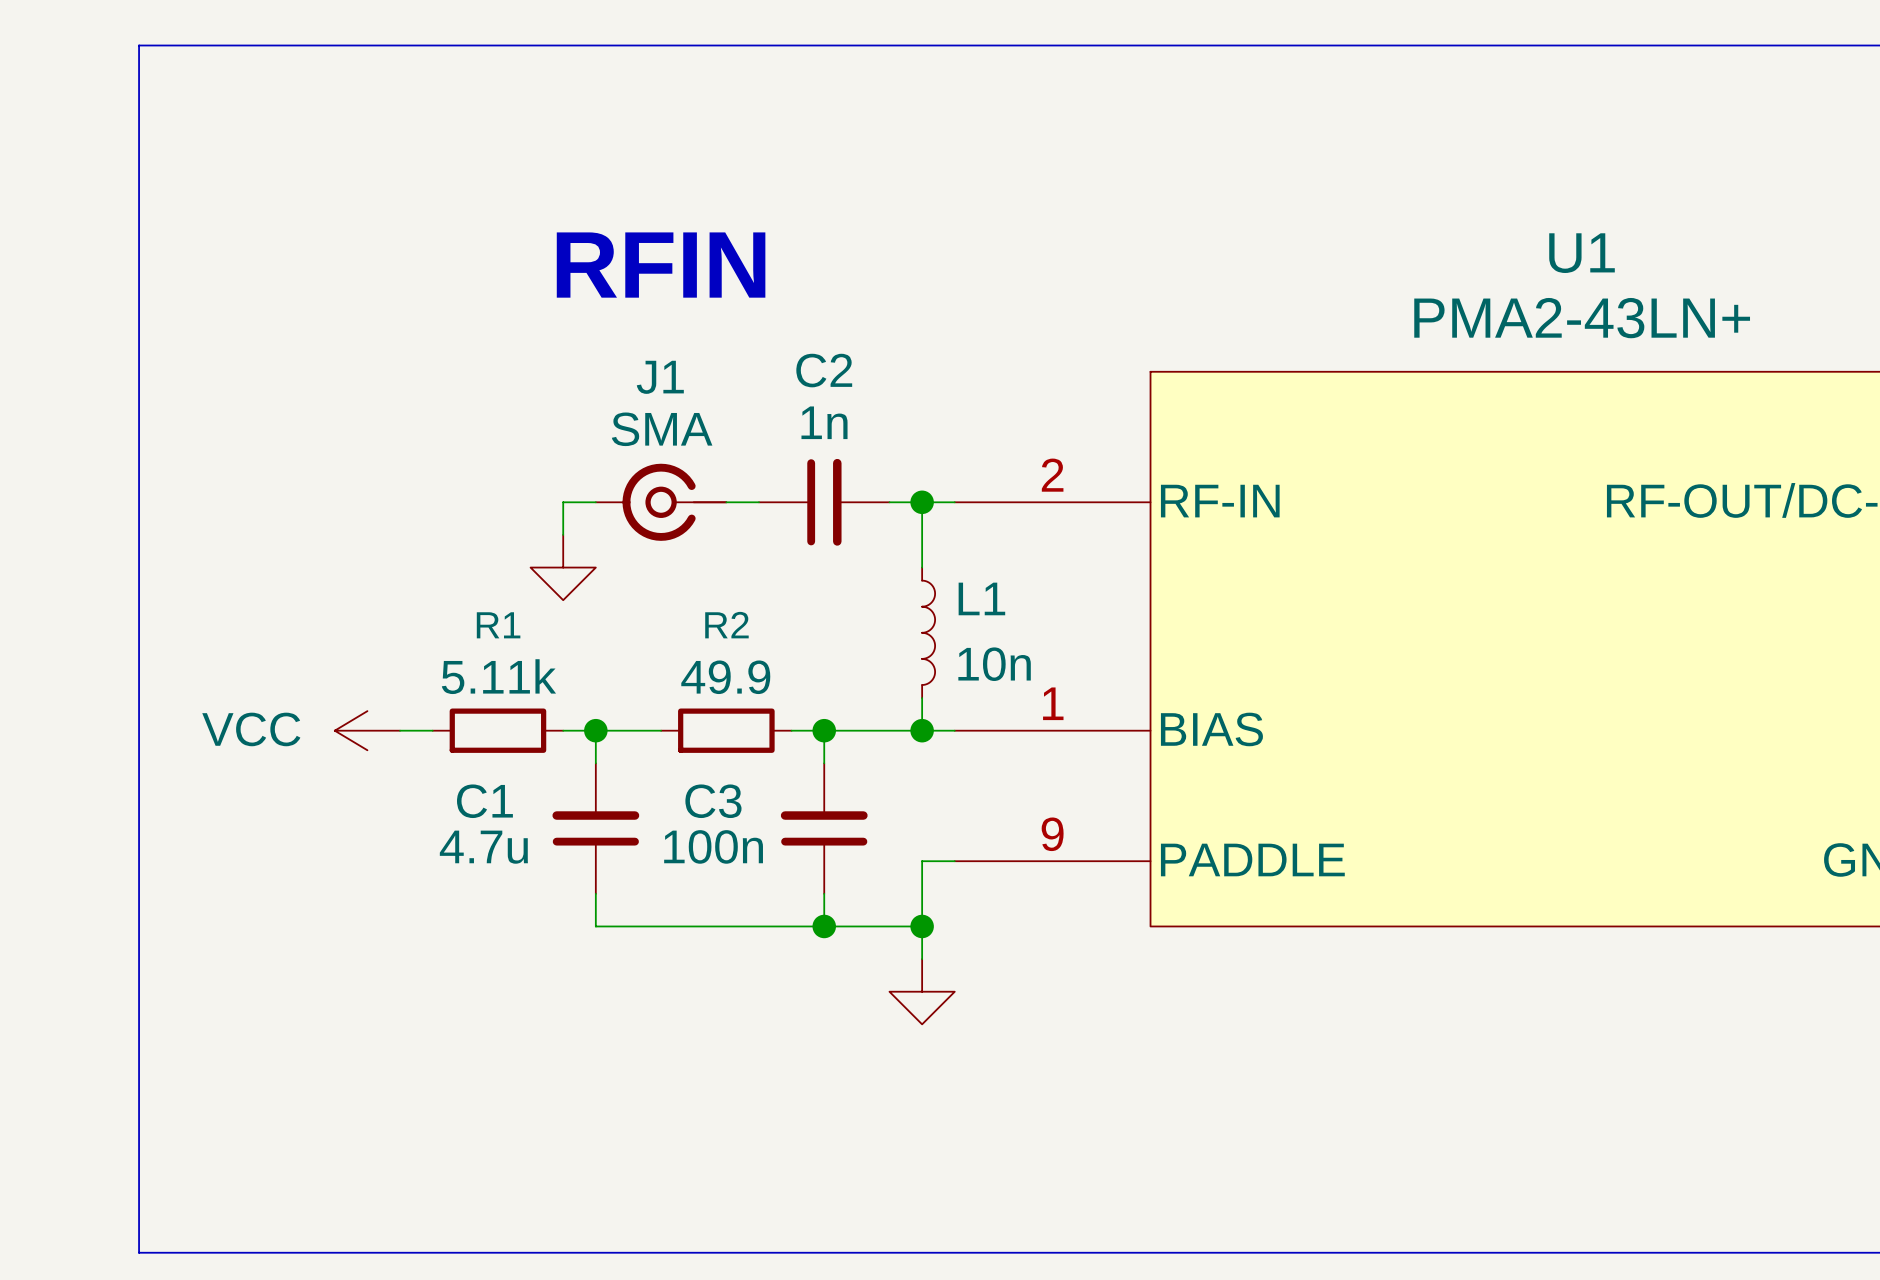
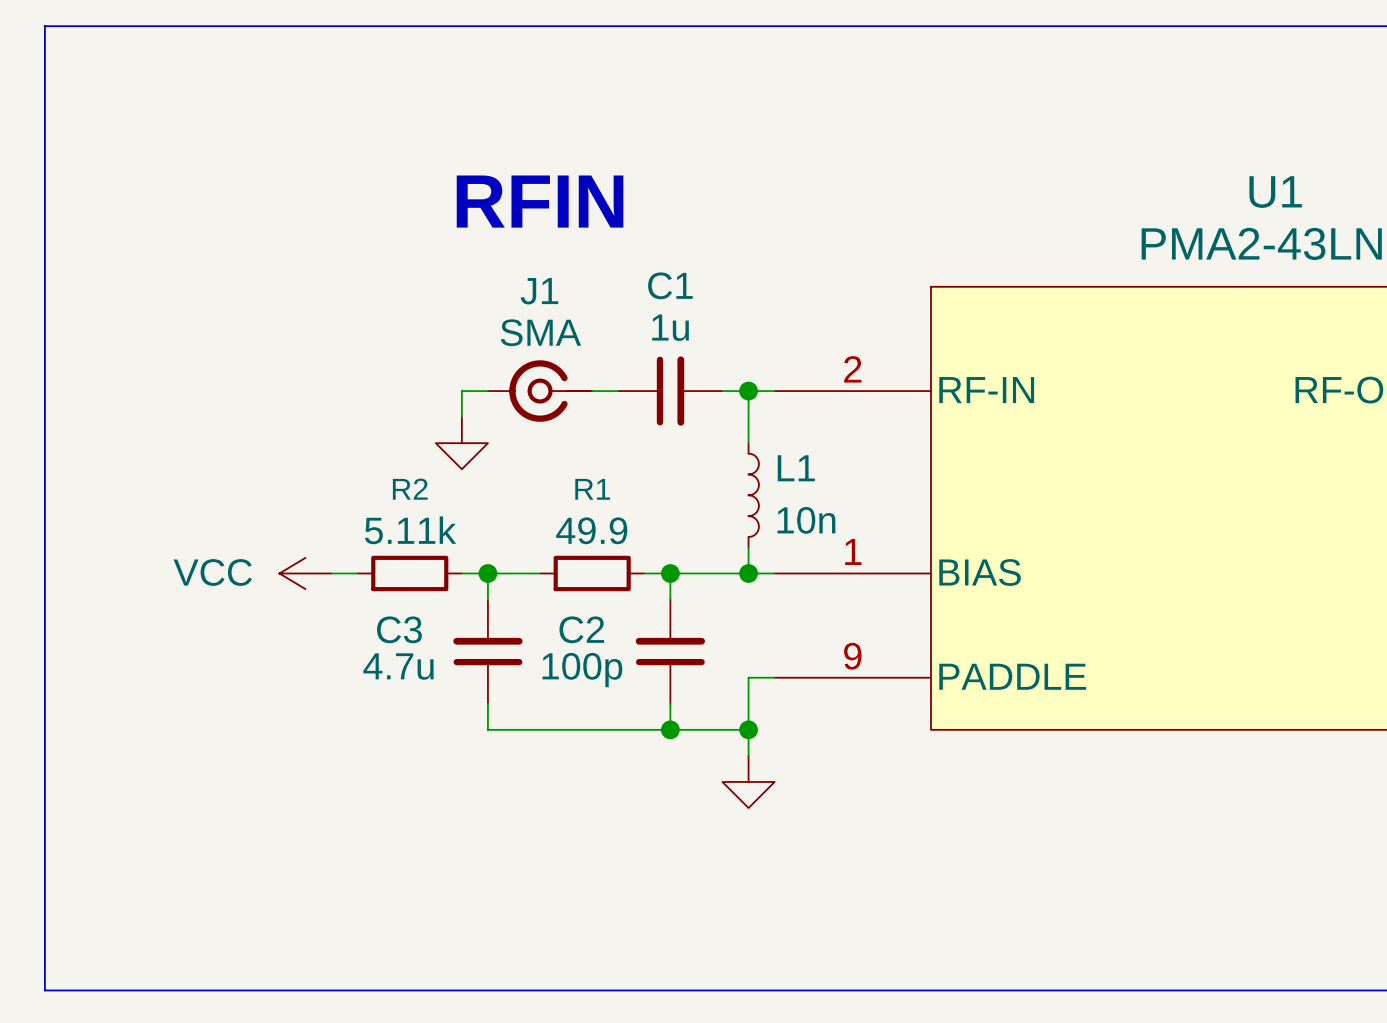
line: (139, 45) (139, 1252) -> (123, 26) (44, 26) (44, 990) (123, 990)
C2 name: C2 (824, 370) -> C1 (670, 285)
C2 value: 1n (824, 422) -> 1u (670, 327)
R1 name: R1 (498, 625) -> R2 (410, 489)
R2 name: R2 (726, 625) -> R1 (592, 489)
C1 name: C1 (484, 801) -> C3 (399, 629)
C3 name: C3 (713, 801) -> C2 (581, 629)
C3 value: 100n (713, 846) -> 100p (582, 670)

